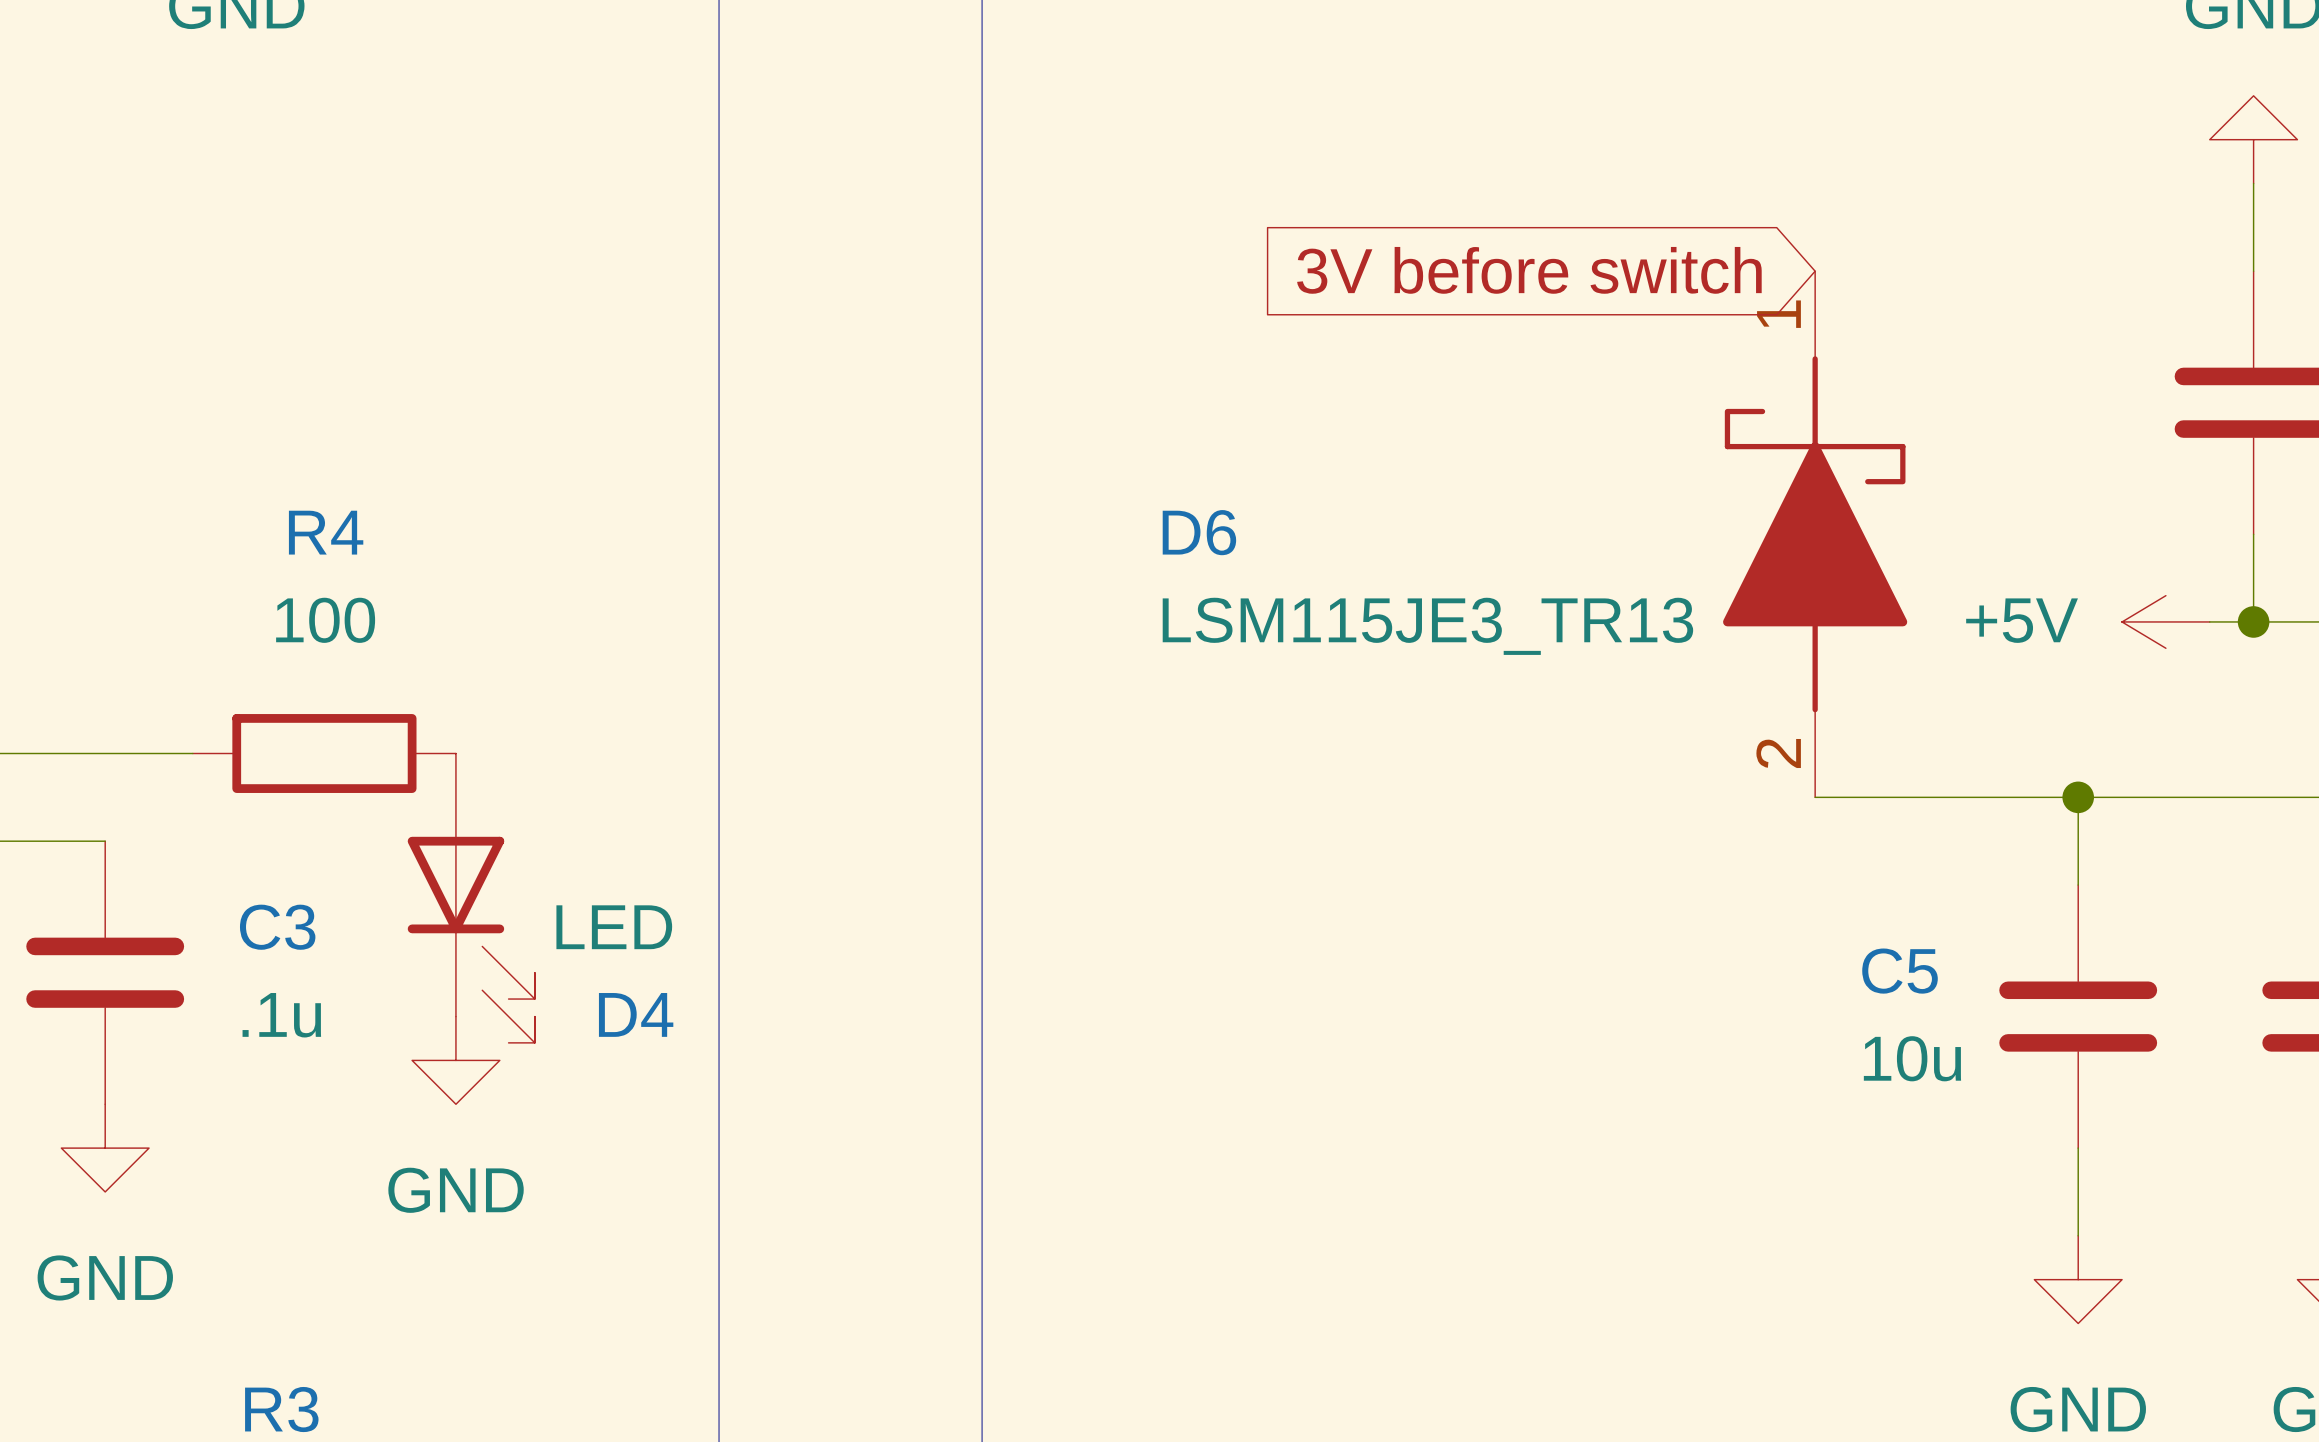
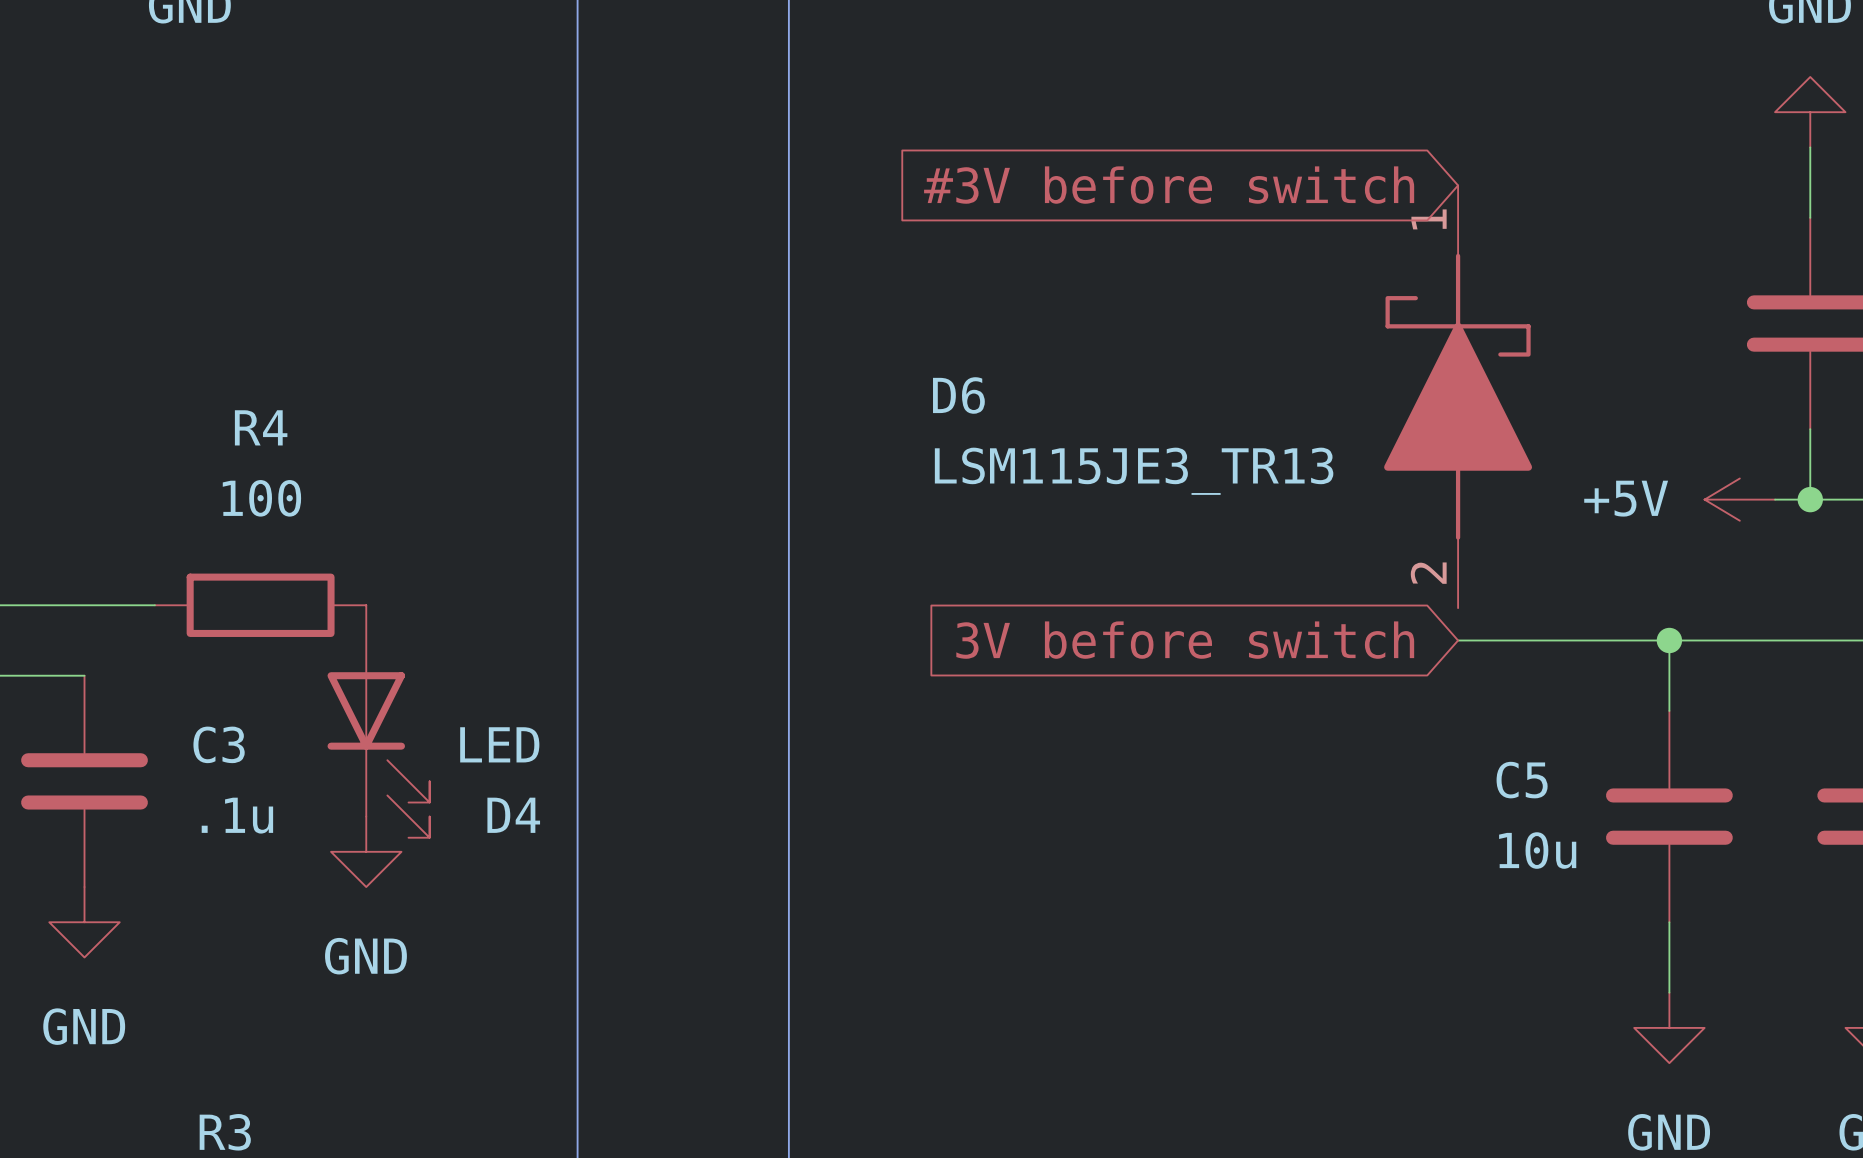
global label: none -> #3V before switch (1169, 185)
global label position: 3V before switch (1529, 270) -> 3V before switch (1185, 640)
D6 position: (1815, 534) -> (1458, 396)

